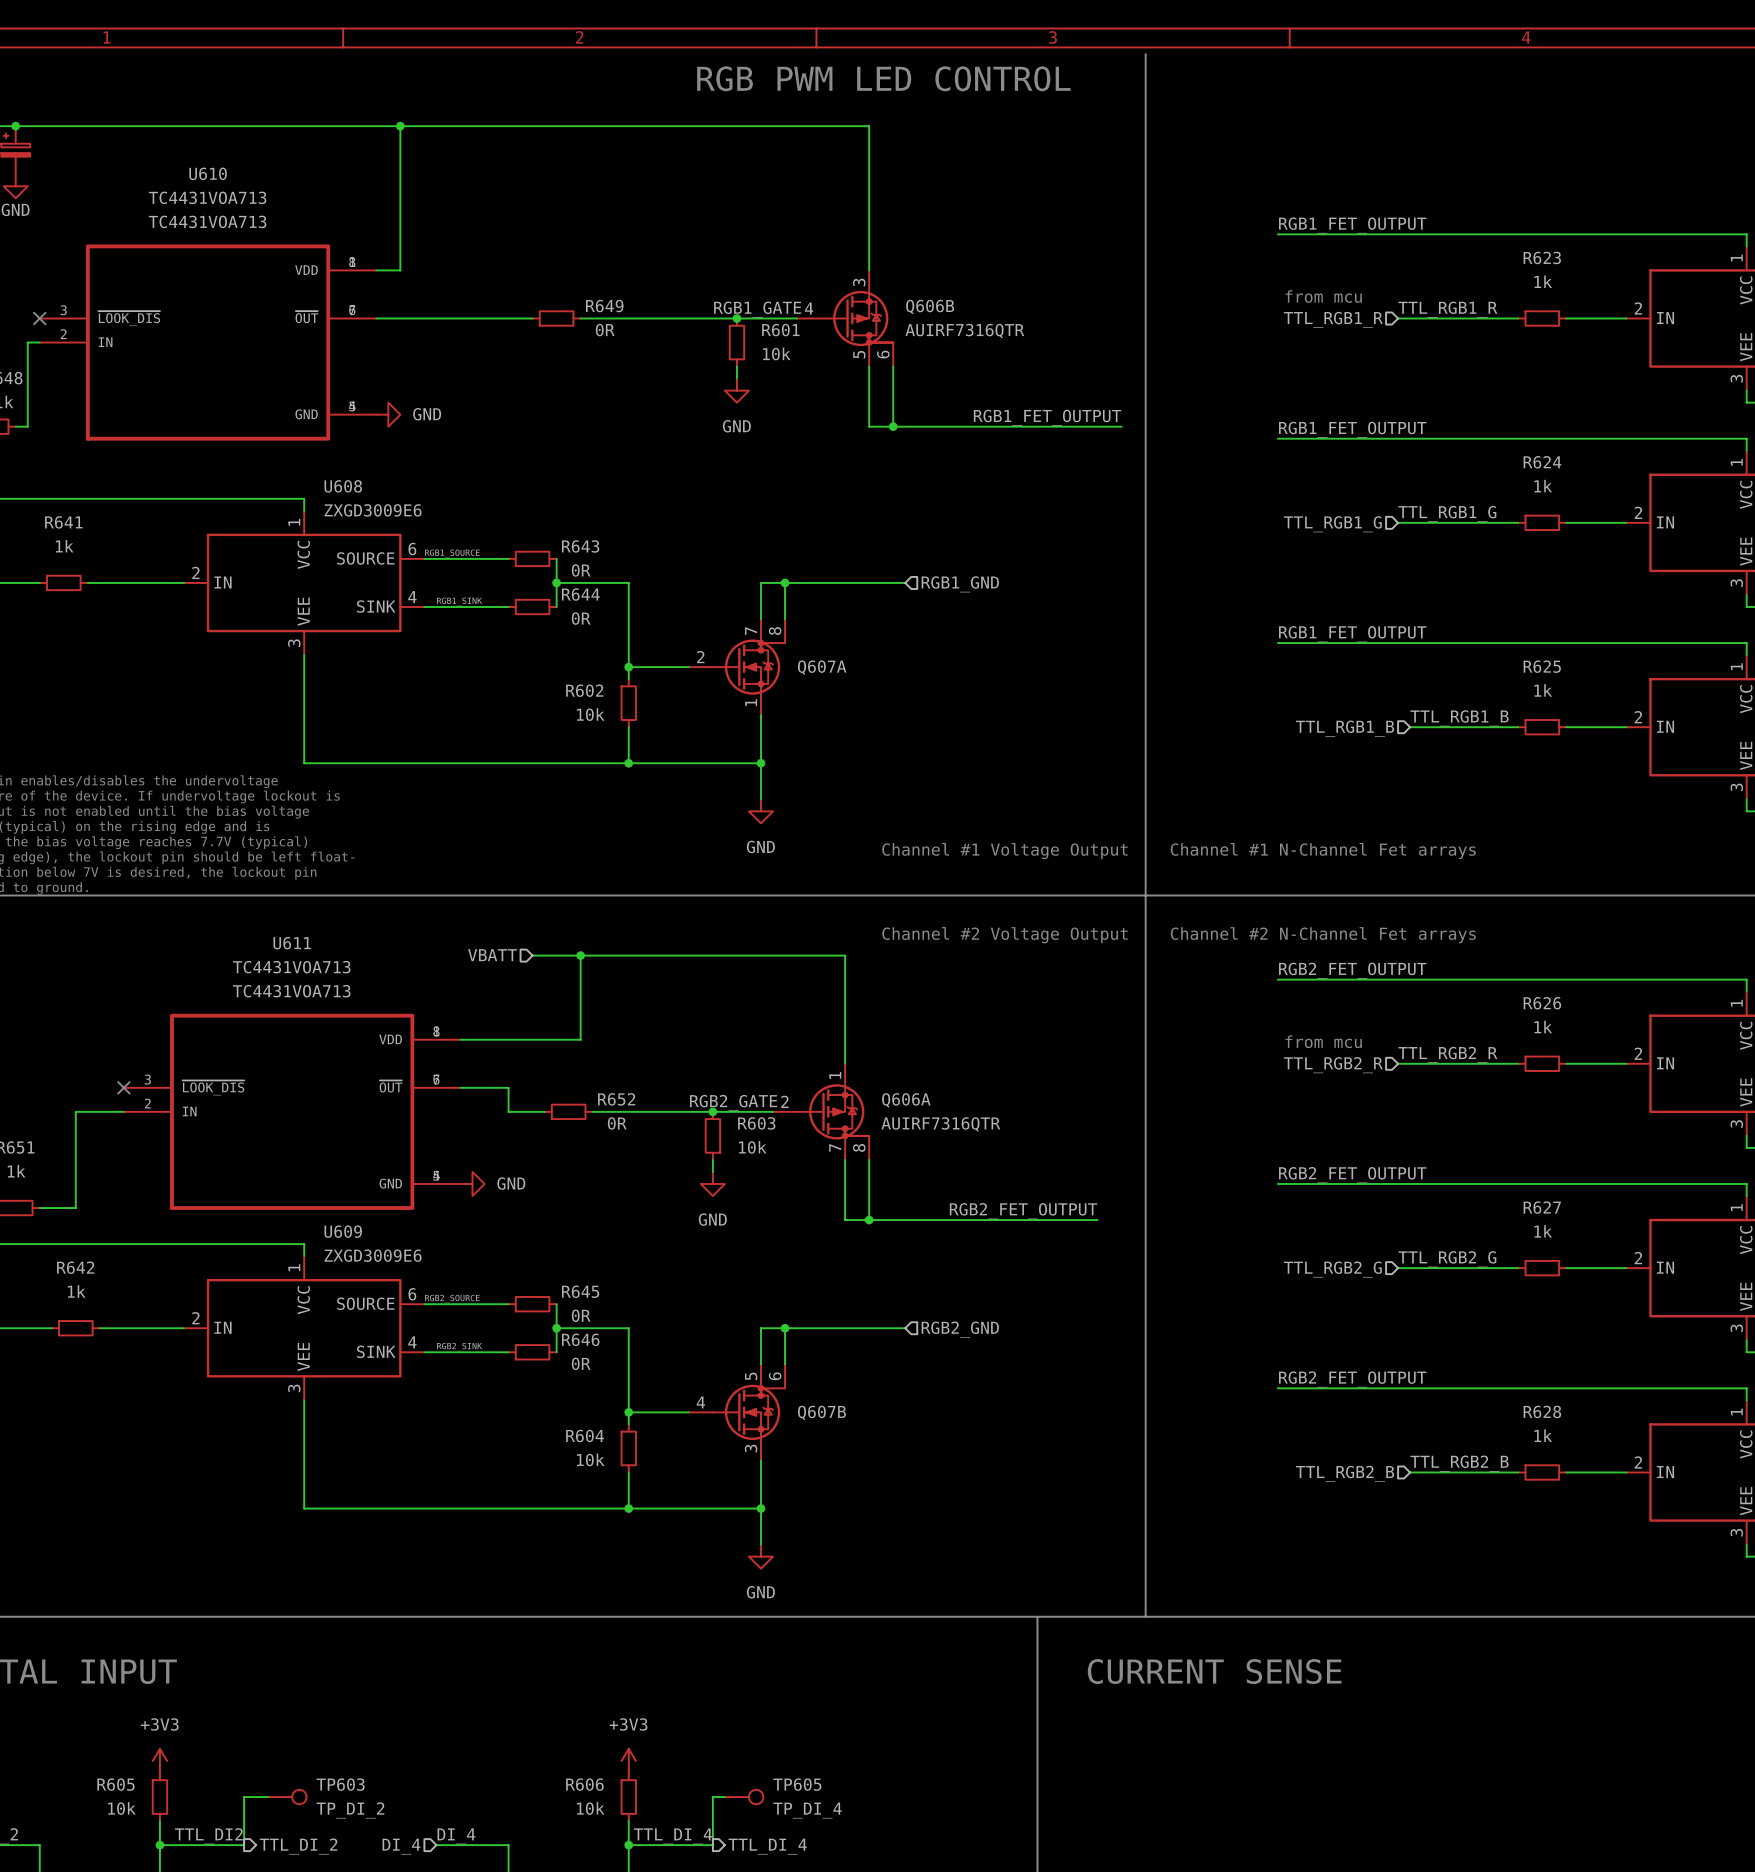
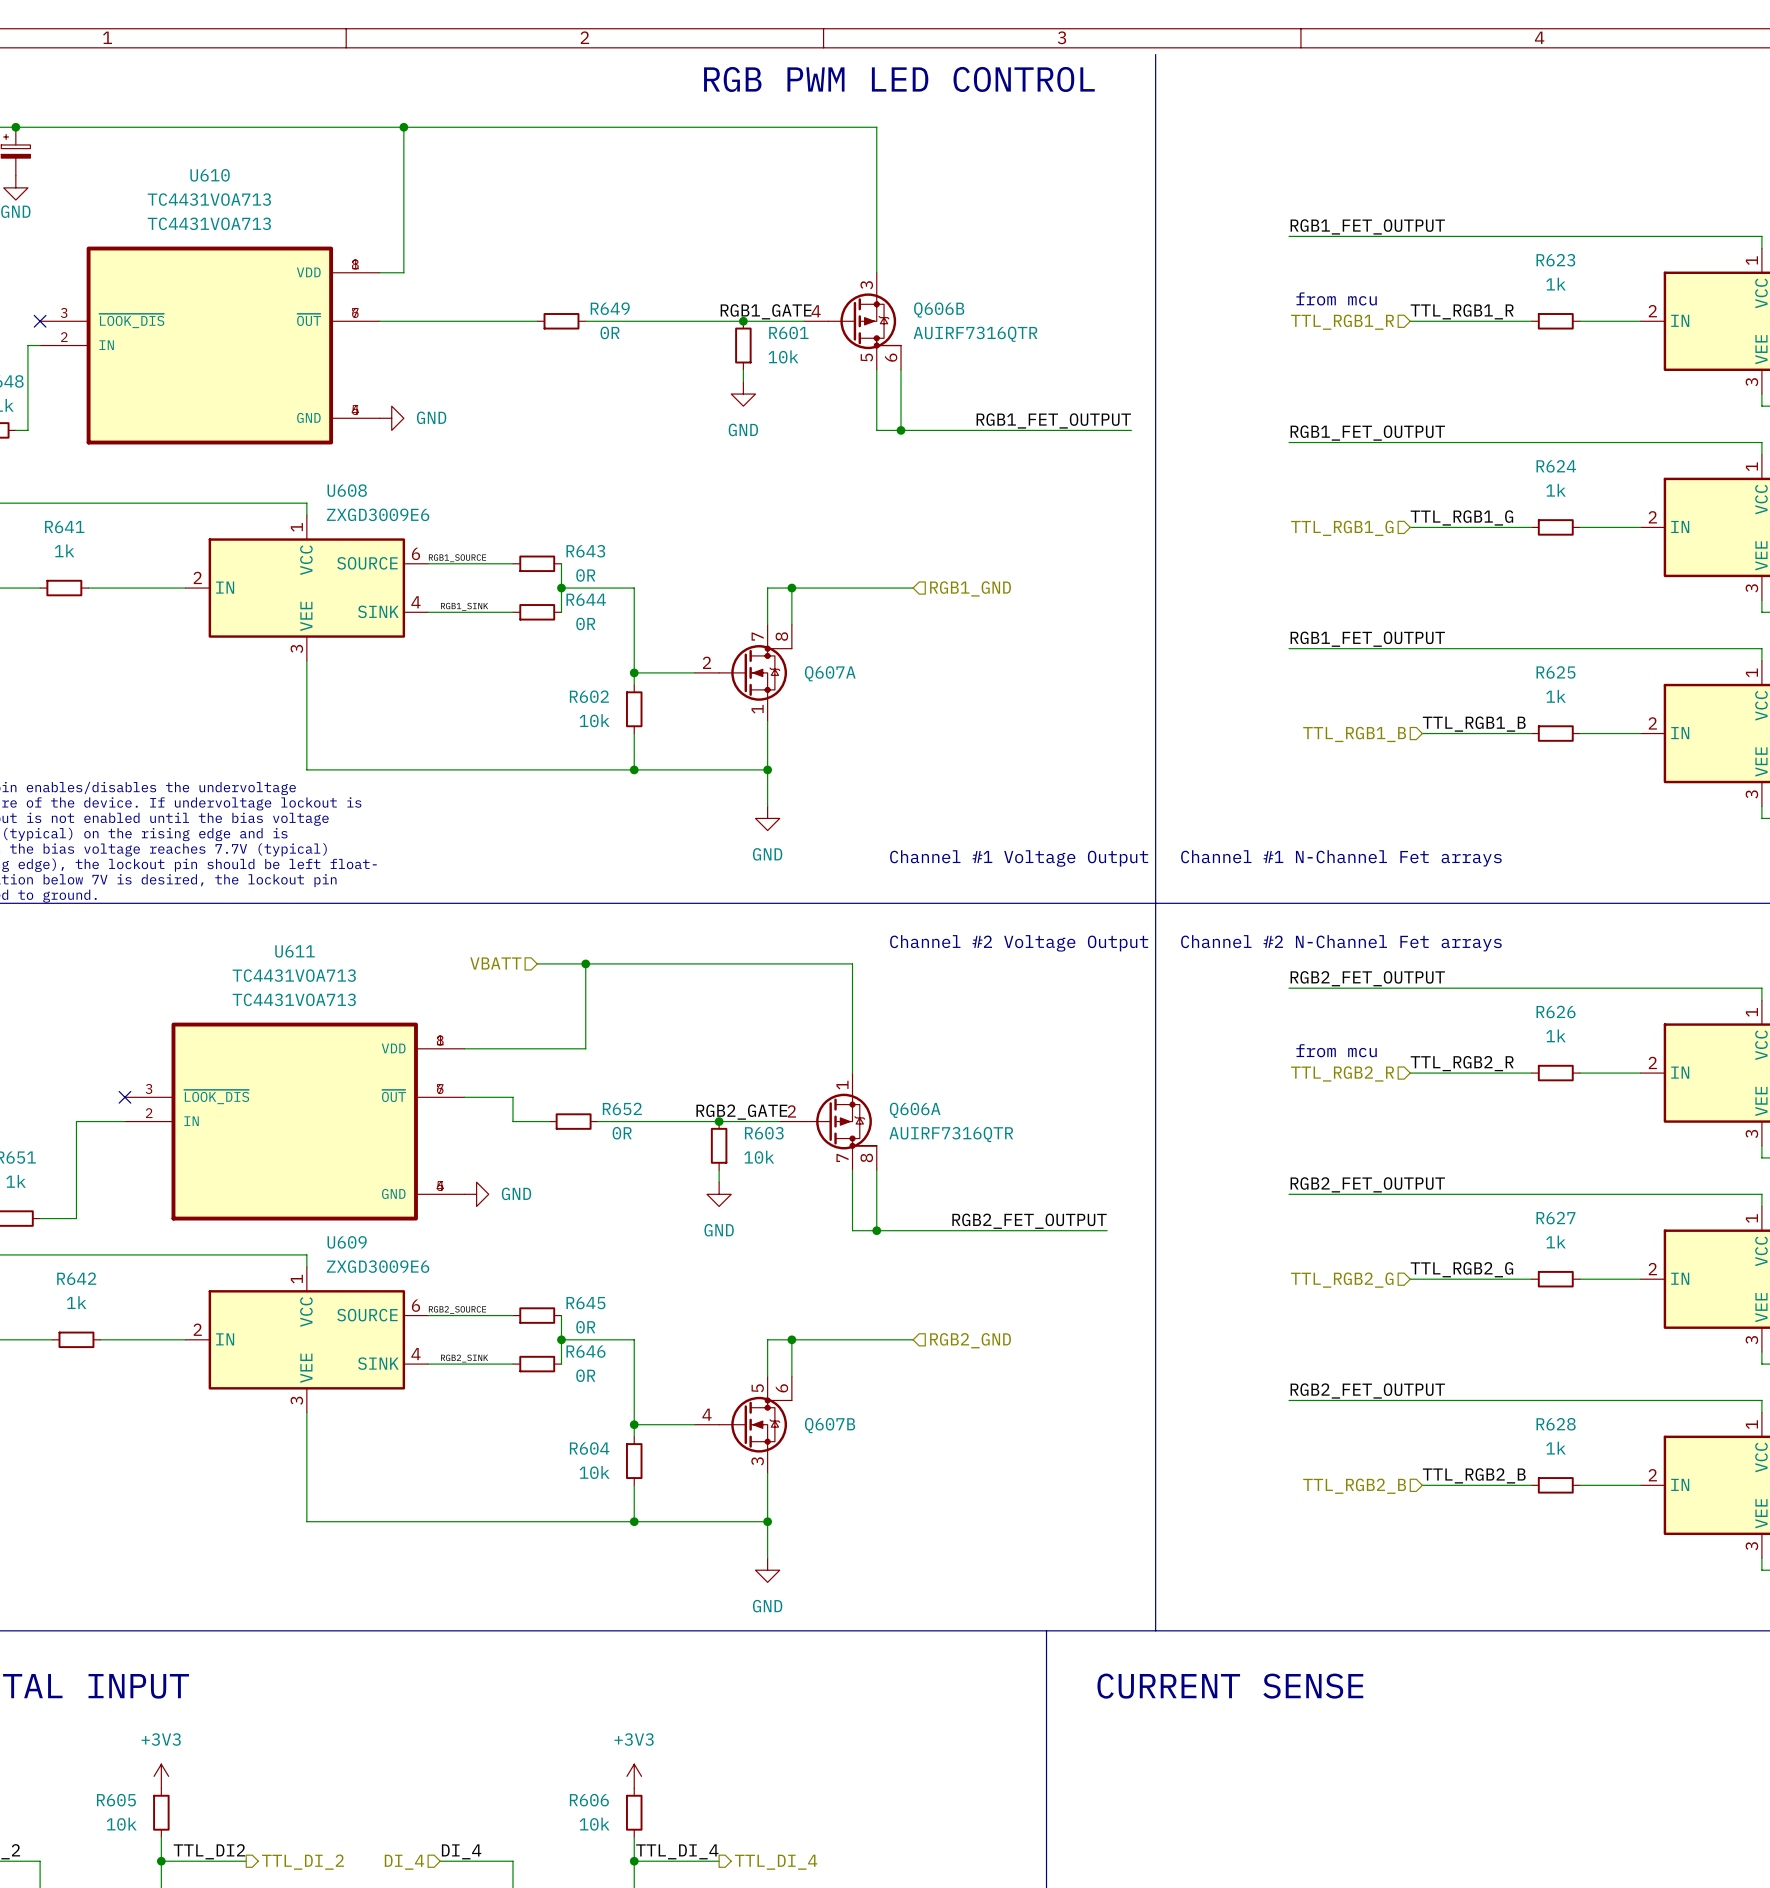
wire: (268, 1797) (244, 1797) (244, 1845) -> none
TP603: TP_DI_2 (287, 1797) -> none
wire: (724, 1797) (712, 1797) (712, 1845) -> none
TP605: TP_DI_4 (744, 1797) -> none

